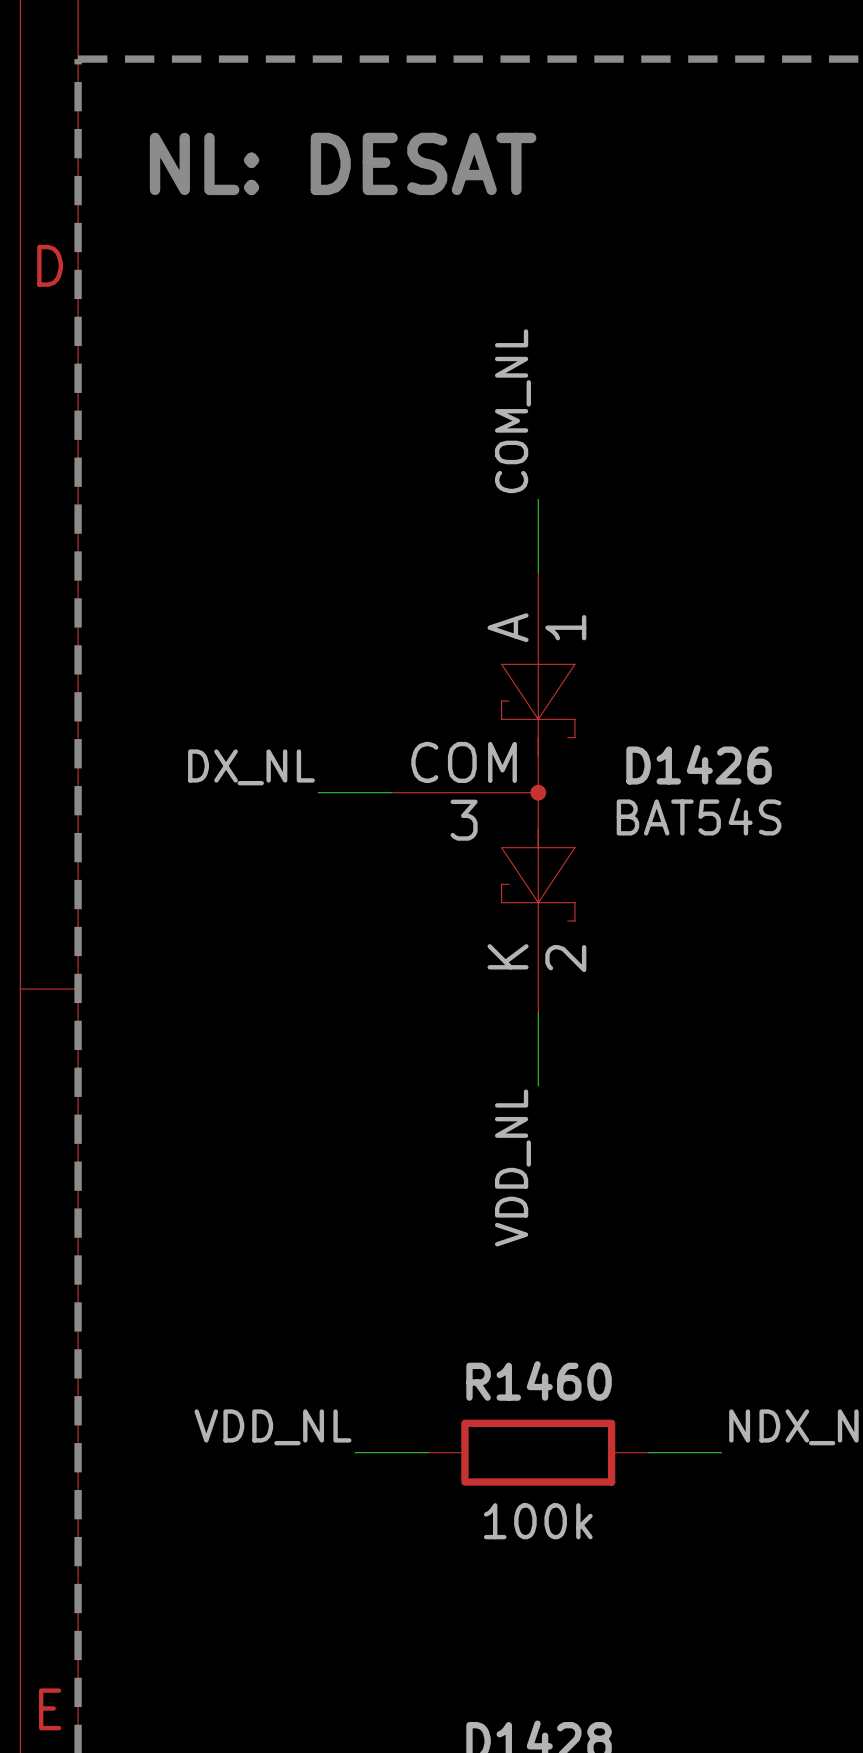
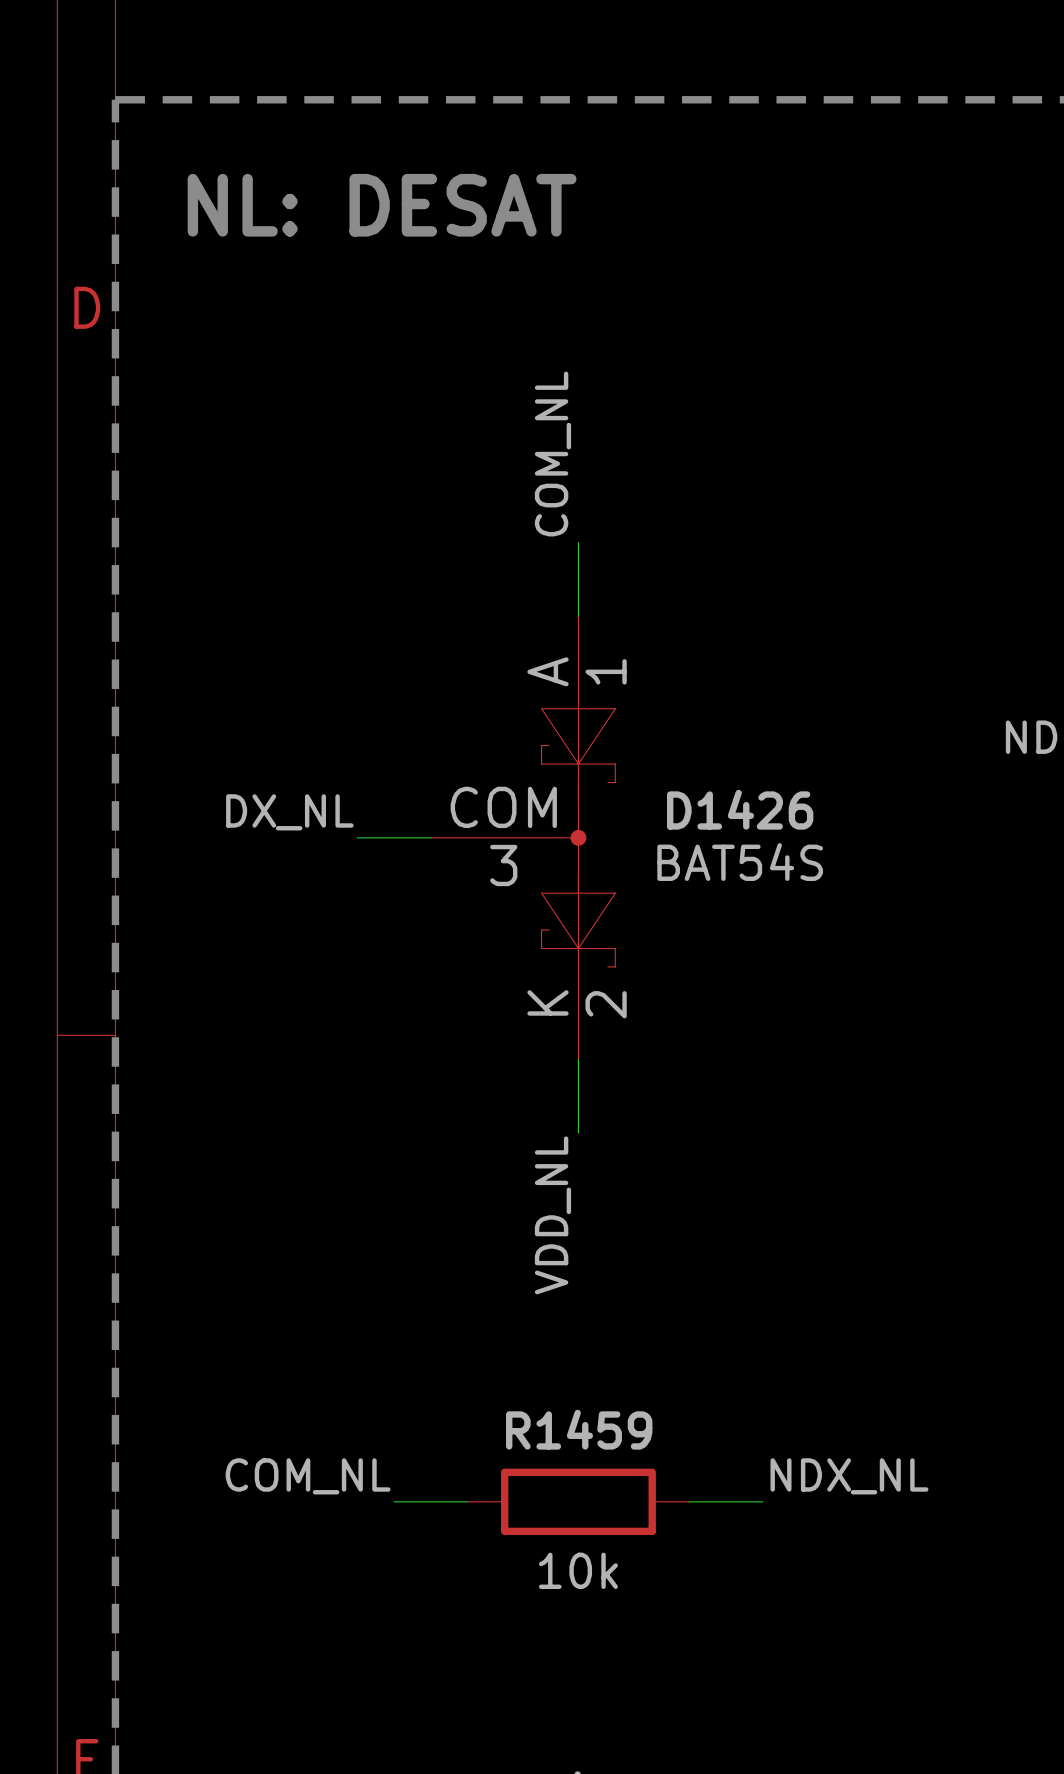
R1460 name: R1460 (539, 1380) -> R1459 (579, 1429)
label: VDD_NL (273, 1427) -> COM_NL (308, 1476)
R1460 value: 100k (538, 1521) -> 10k (578, 1570)

